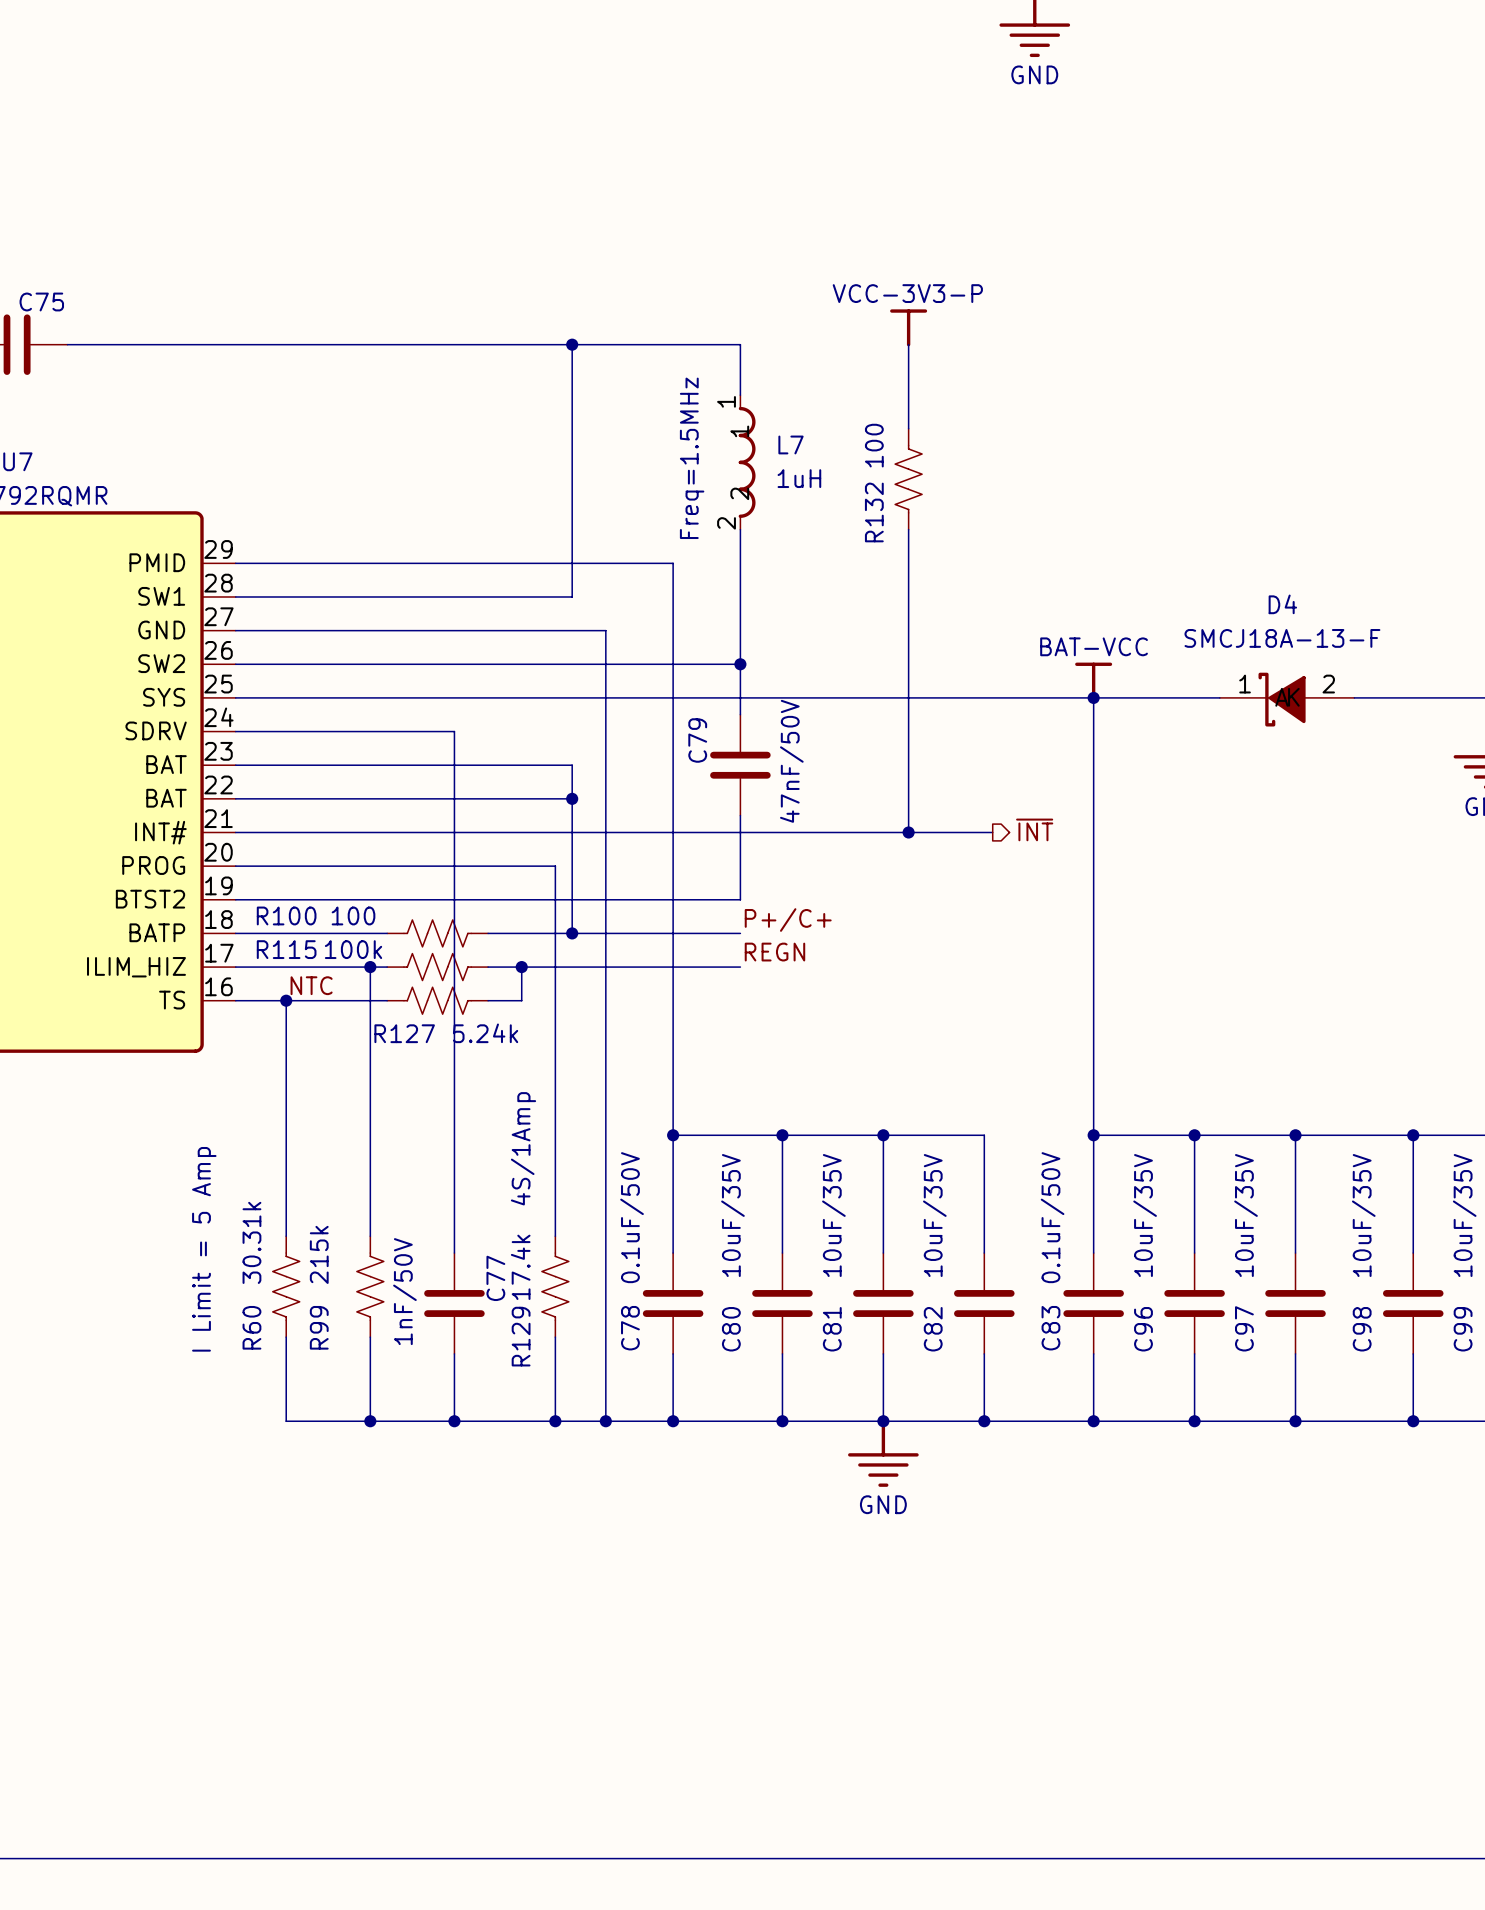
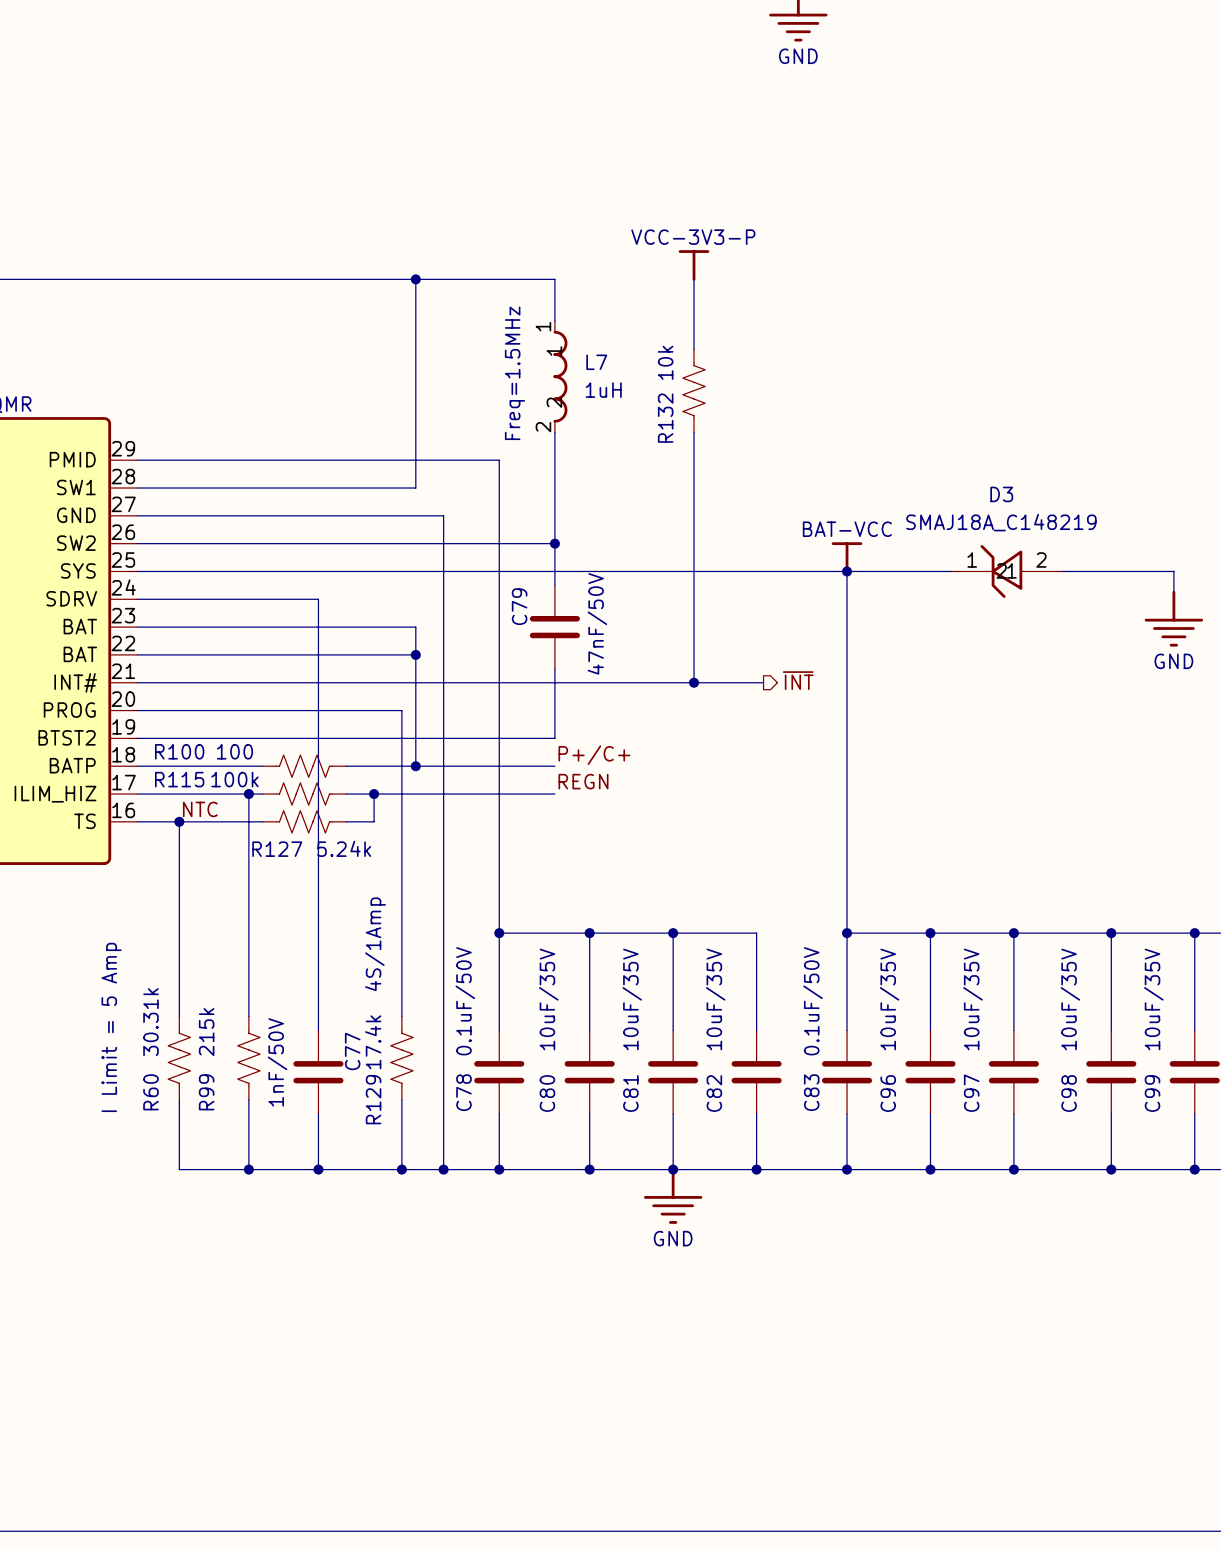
R132 value: 100 (874, 445) -> 10k (665, 362)
D3: none -> SMAJ18A_C148219 (1006, 571)
D4: SMCJ18A-13-F (1287, 699) -> none

